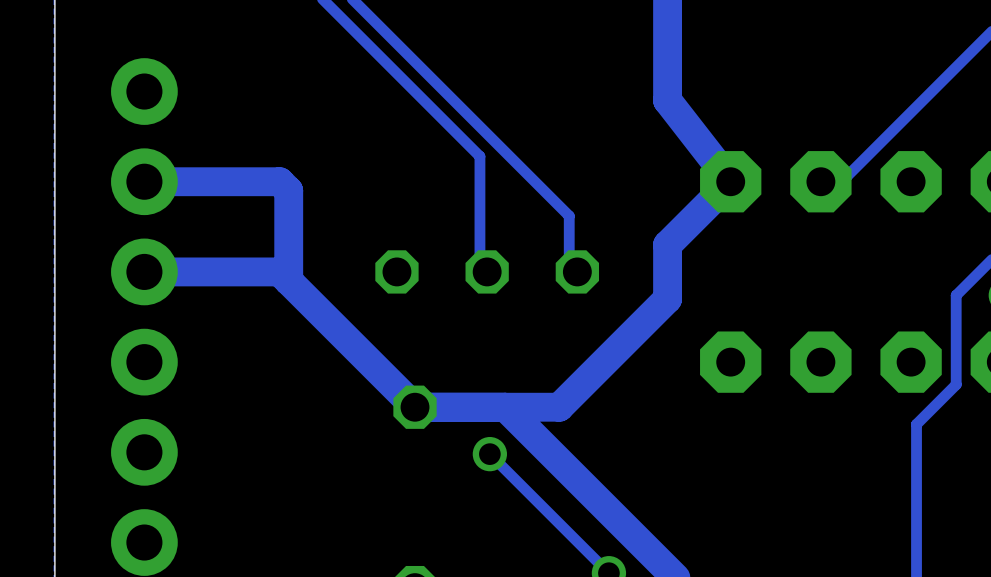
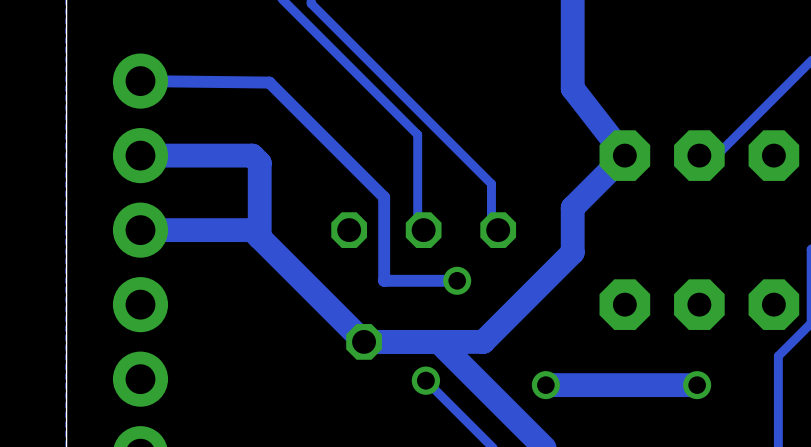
track: none -> (140, 81) (269, 82) (384, 197) (384, 280) (457, 280)
via: none -> (457, 280)
via: none -> (545, 385)
track: none -> (697, 385) (545, 385)
via: none -> (697, 385)

